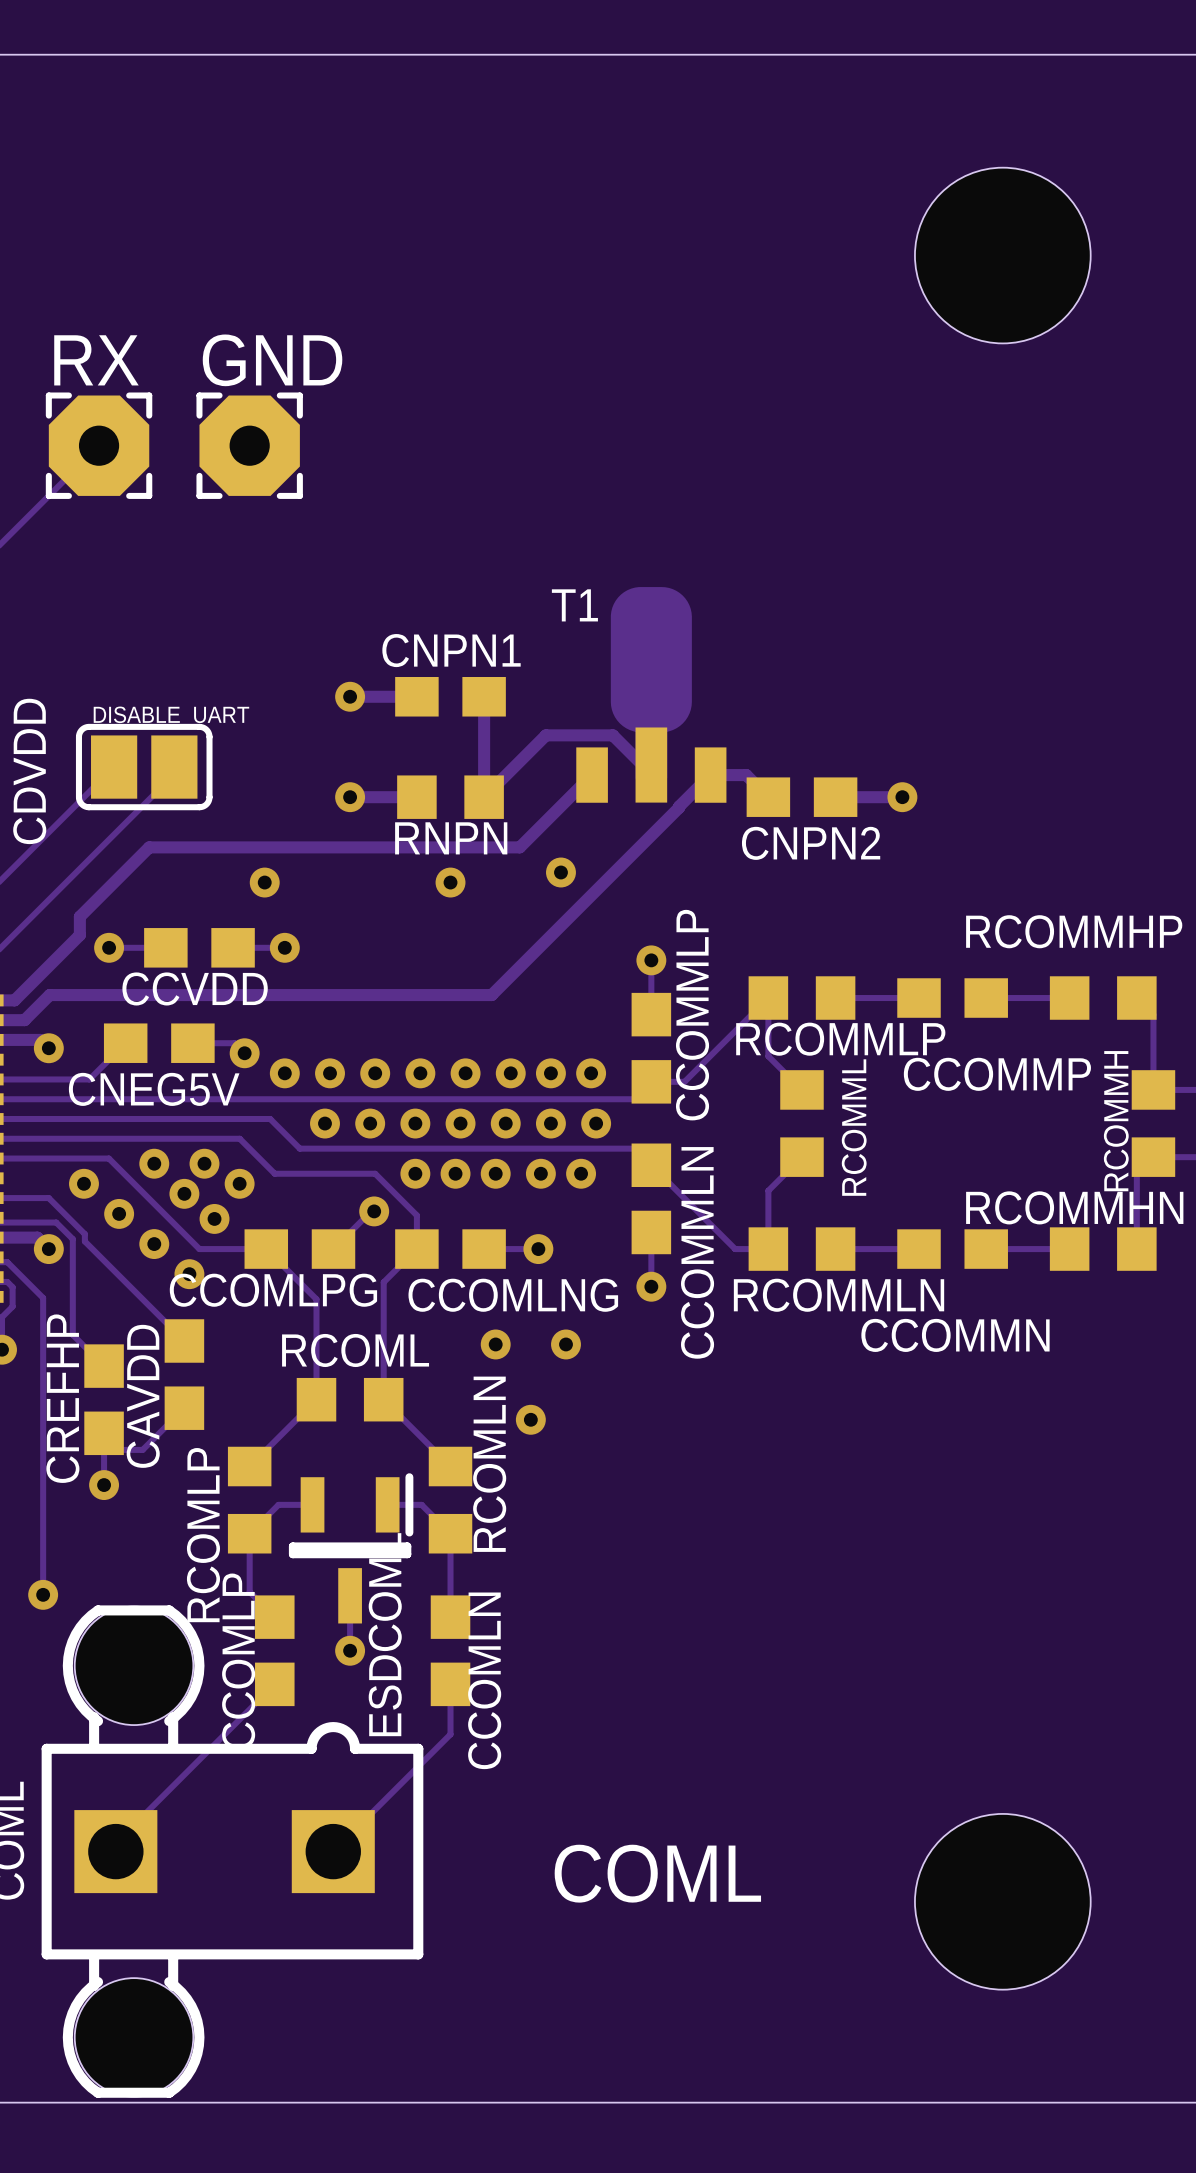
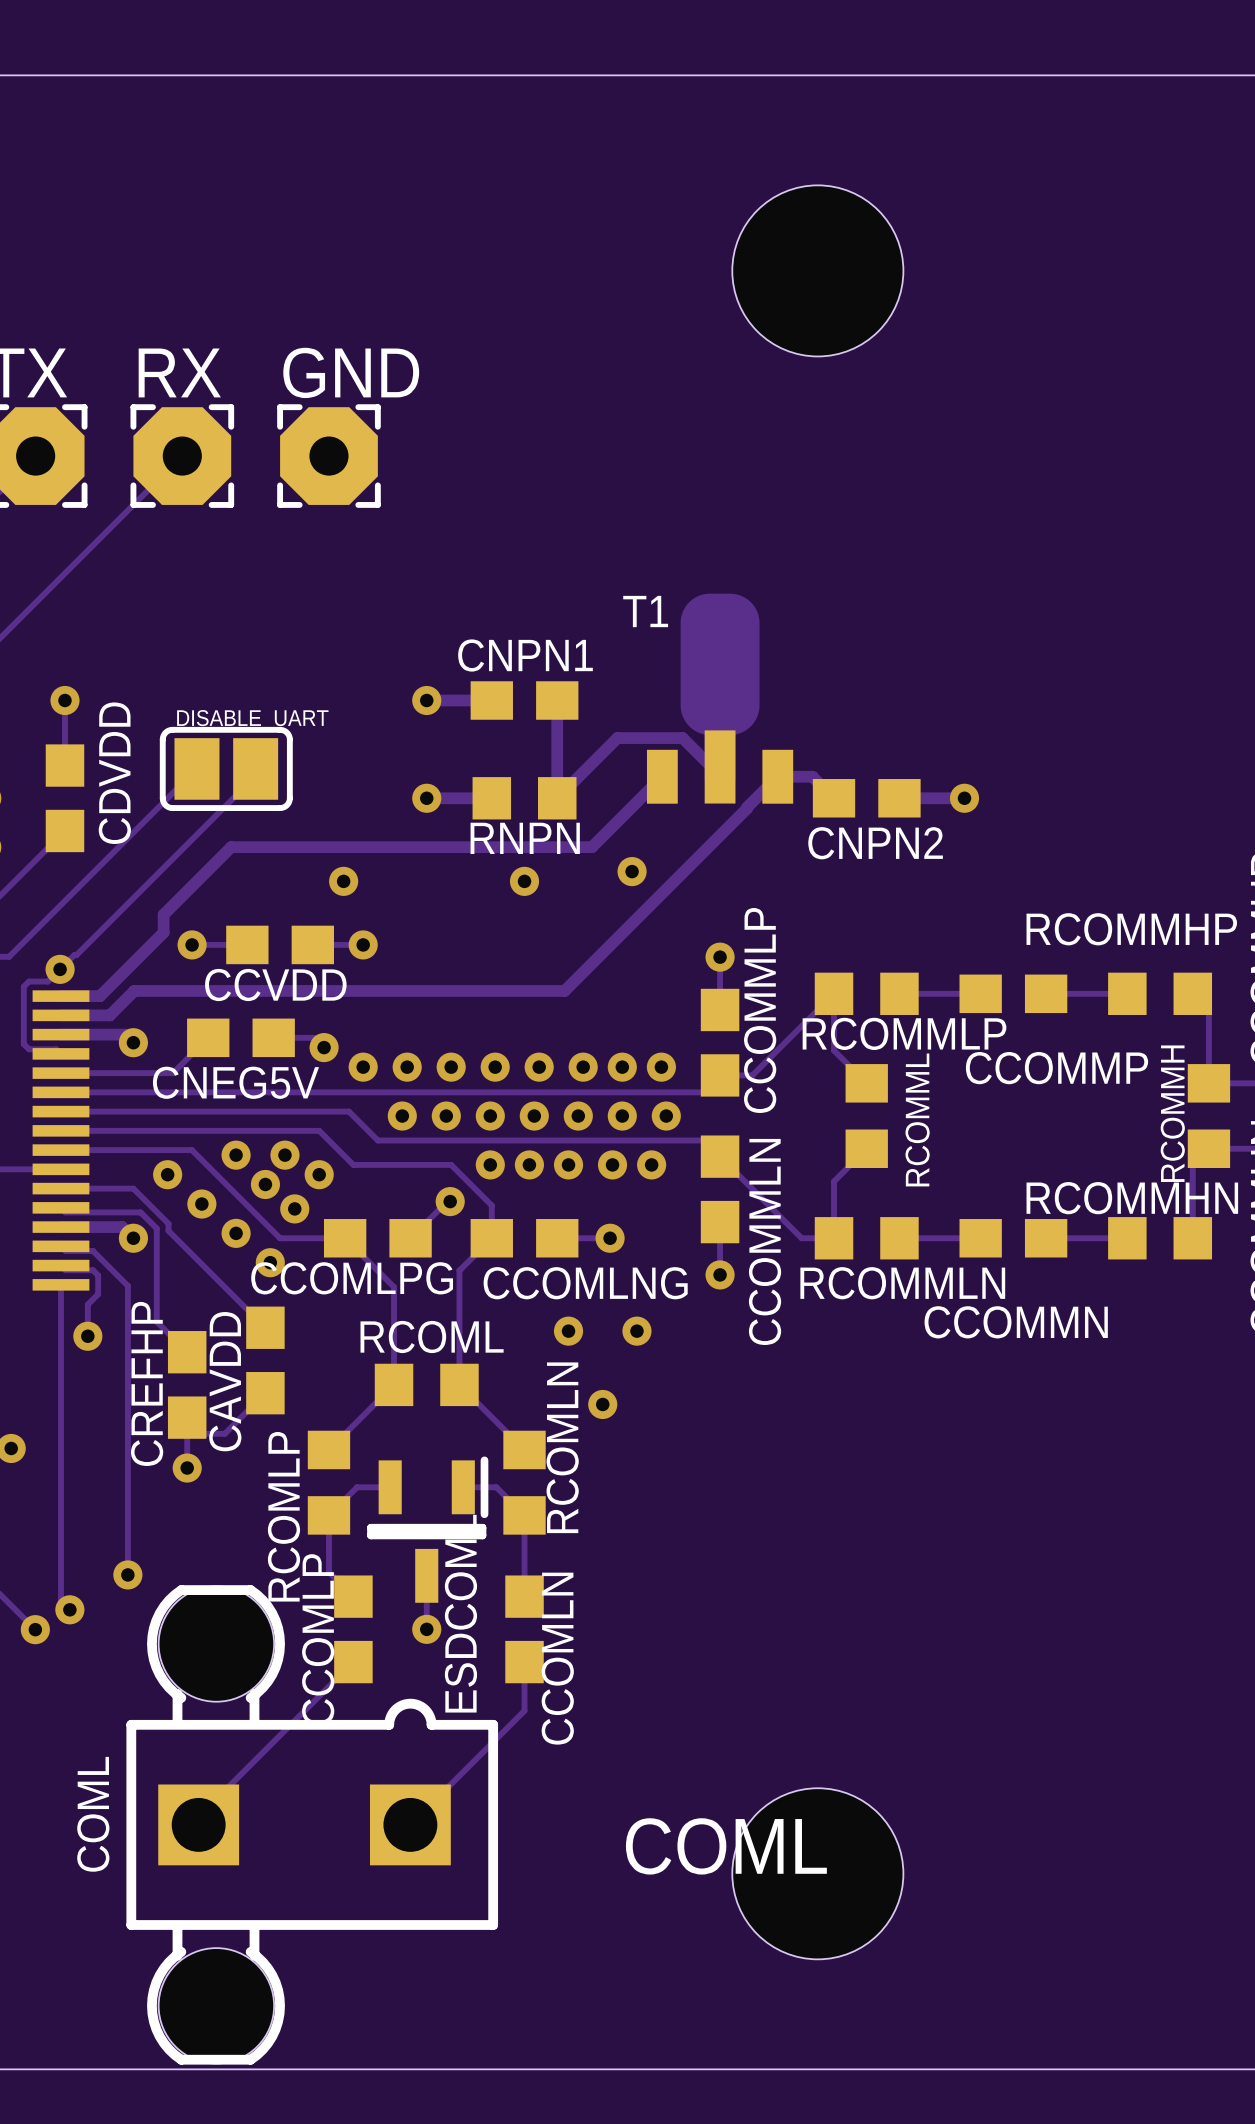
hole position: (1002, 255) -> (817, 270)
hole position: (1002, 1901) -> (817, 1873)

